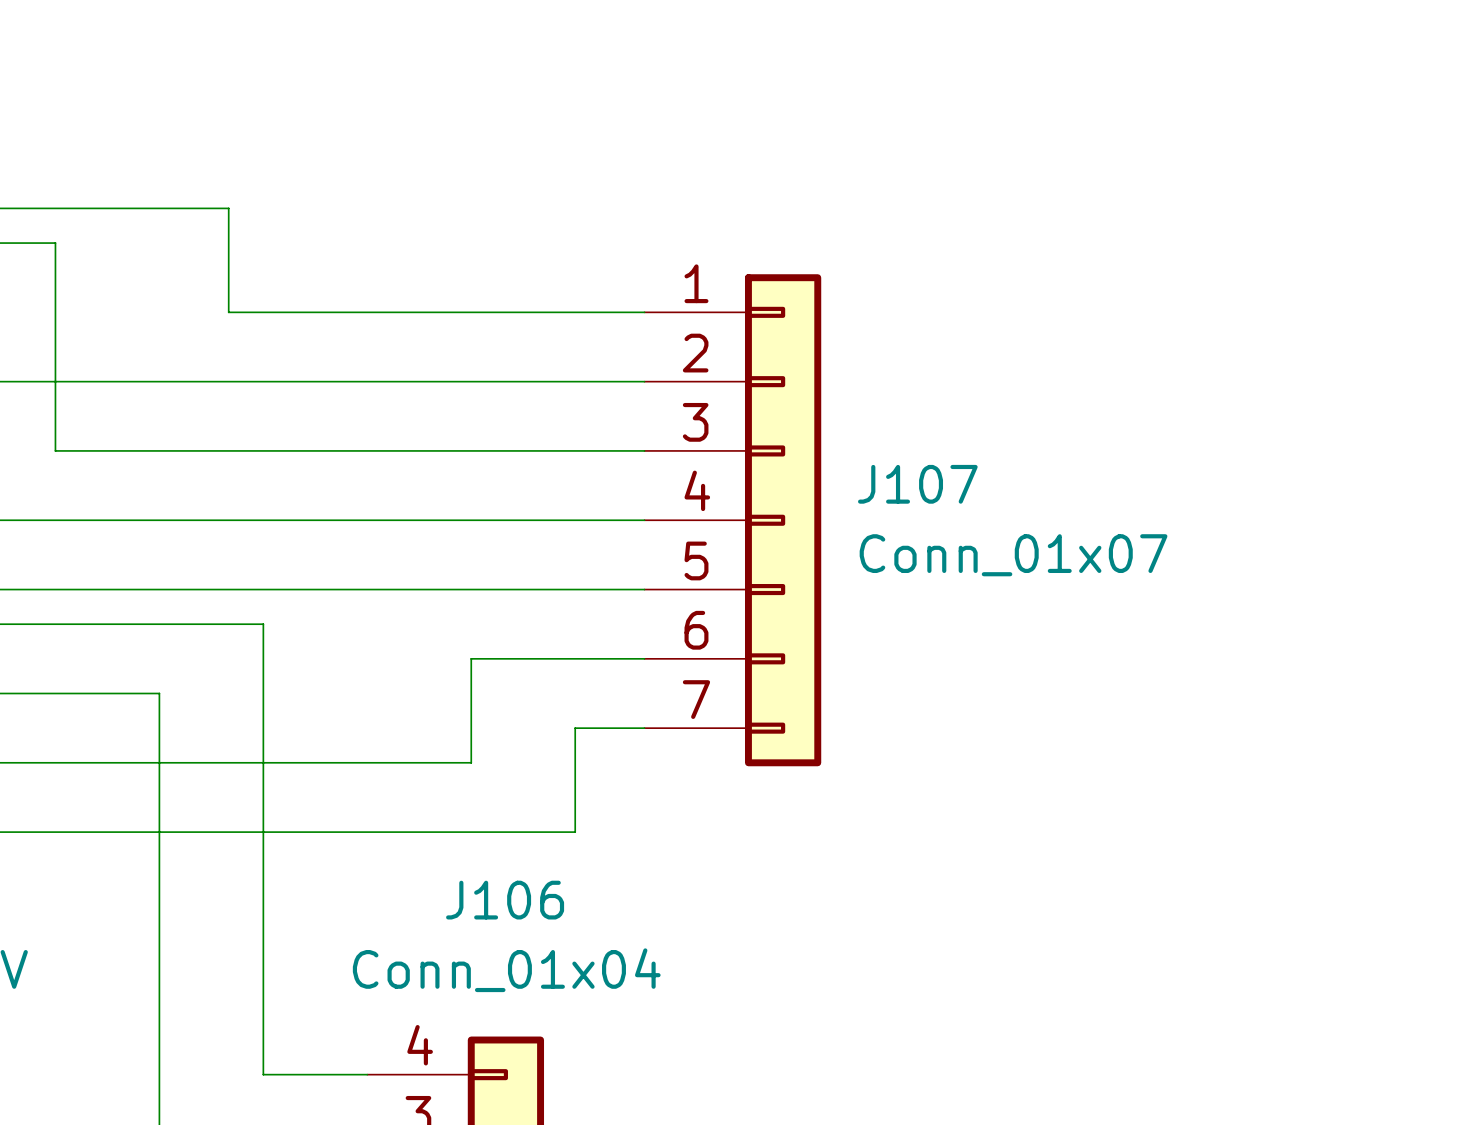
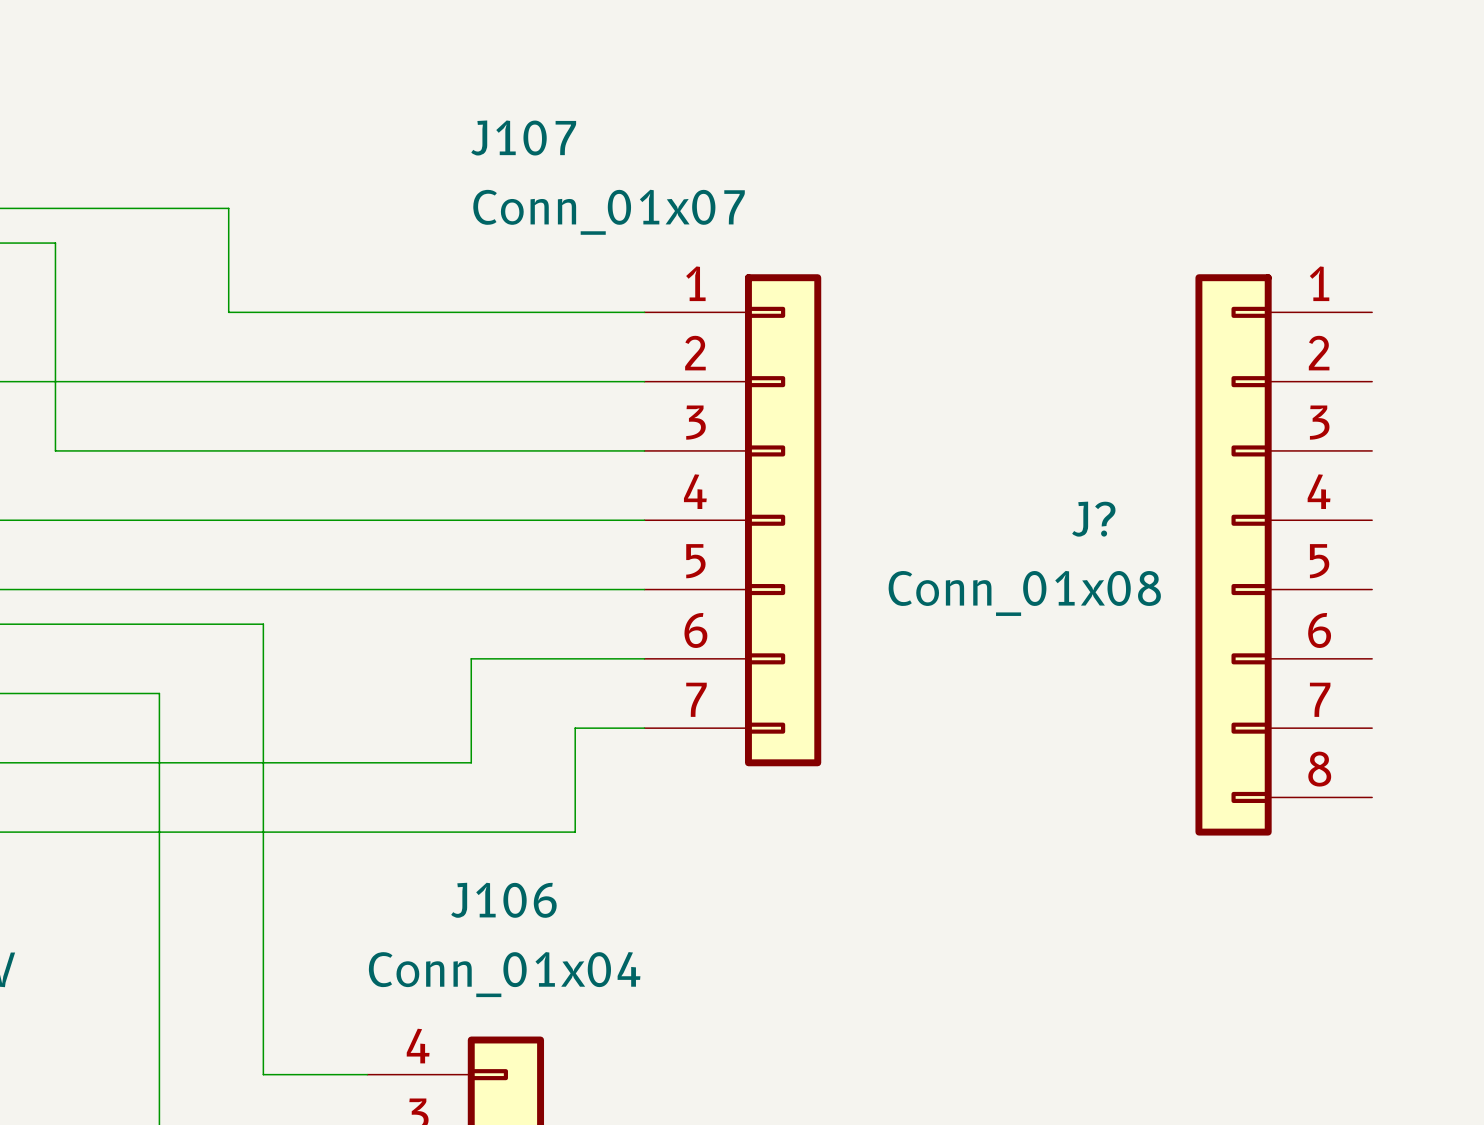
J107 name position: J107 (917, 484) -> J107 (523, 137)
J?: none -> Conn_01x08 (1283, 554)
J107 value position: Conn_01x07 (1013, 555) -> Conn_01x07 (609, 212)

